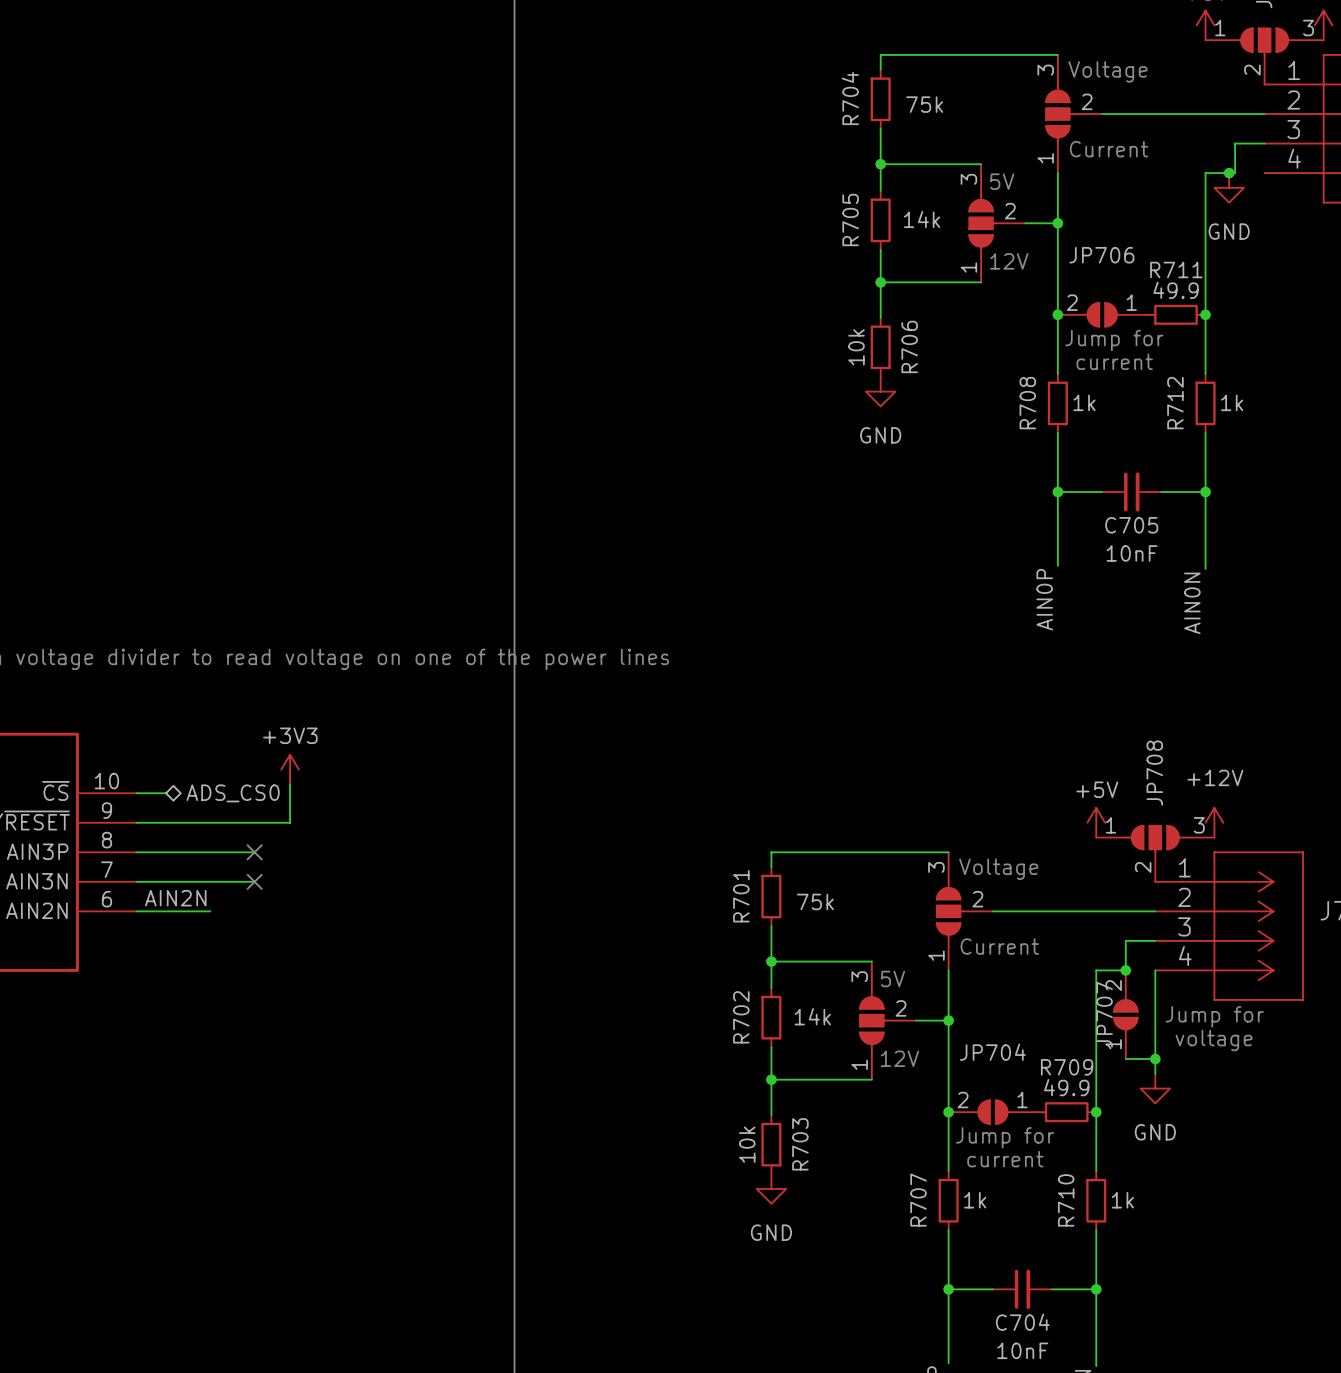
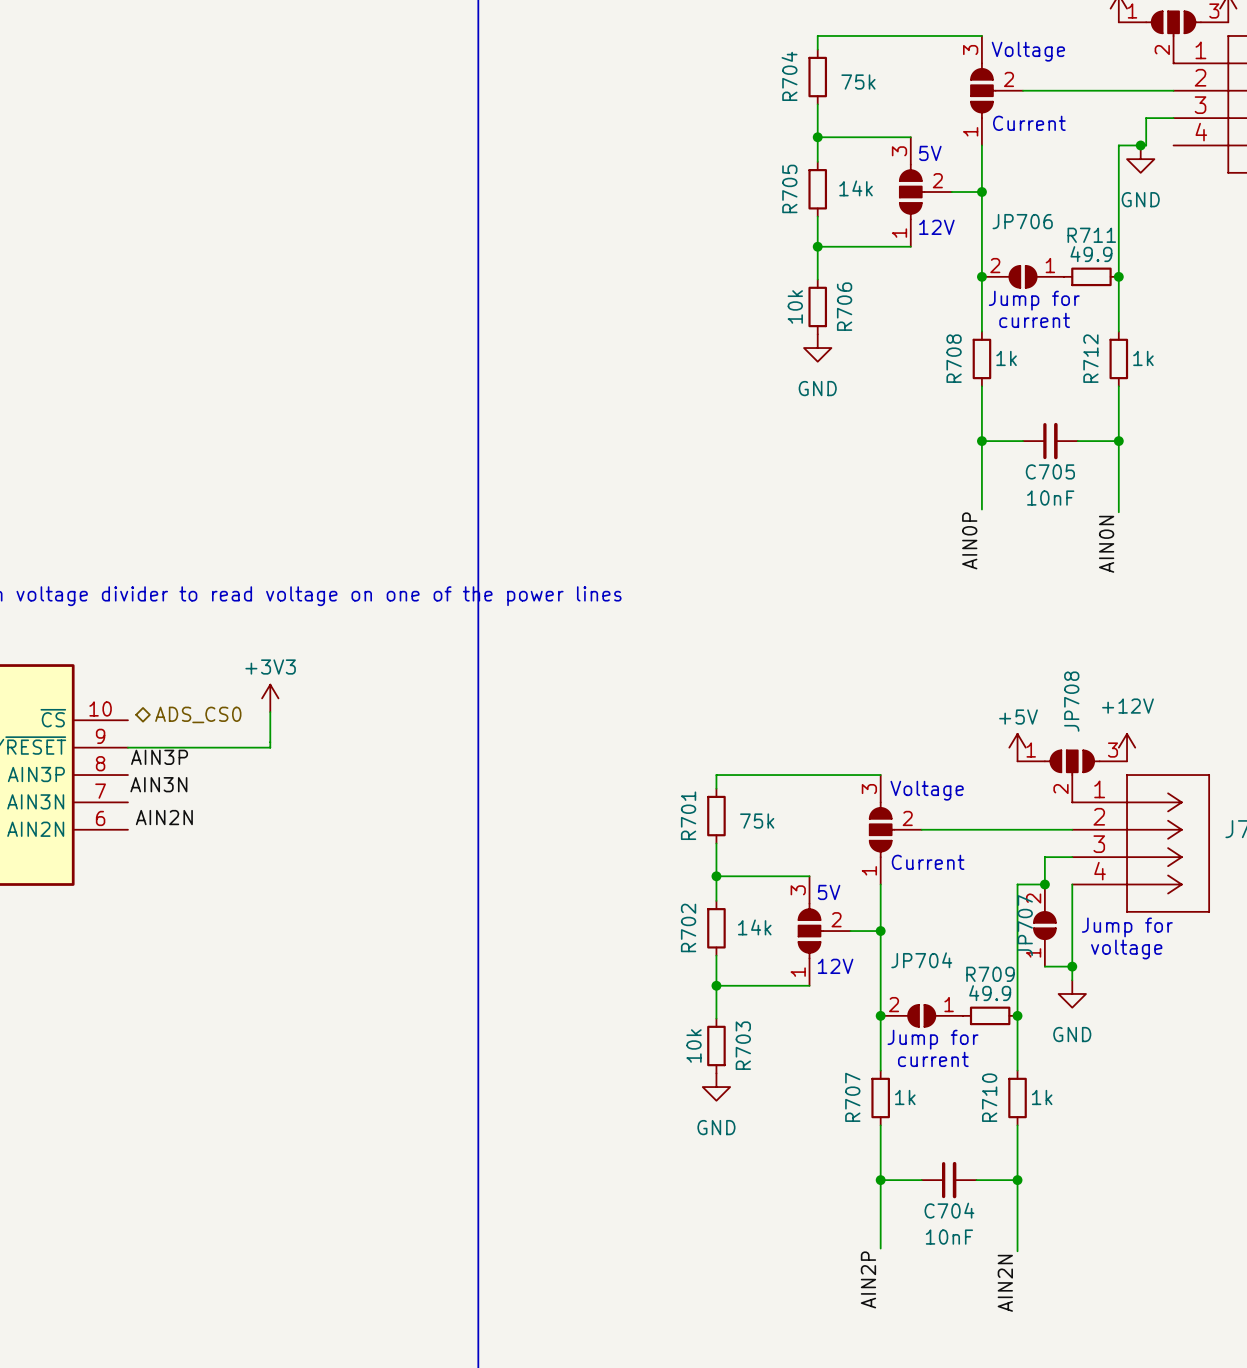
wire: (136, 793) (166, 793) -> none
hierarchical label position: ADS_CS0 (233, 793) -> ADS_CS0 (198, 714)
label: none -> AIN3P (159, 757)
wire: (136, 852) (254, 852) -> none
no-connect mark: (254, 852) -> none
label: none -> AIN3N (158, 784)
wire: (136, 881) (254, 881) -> none
no-connect mark: (254, 881) -> none
wire: (136, 911) (210, 911) -> none

